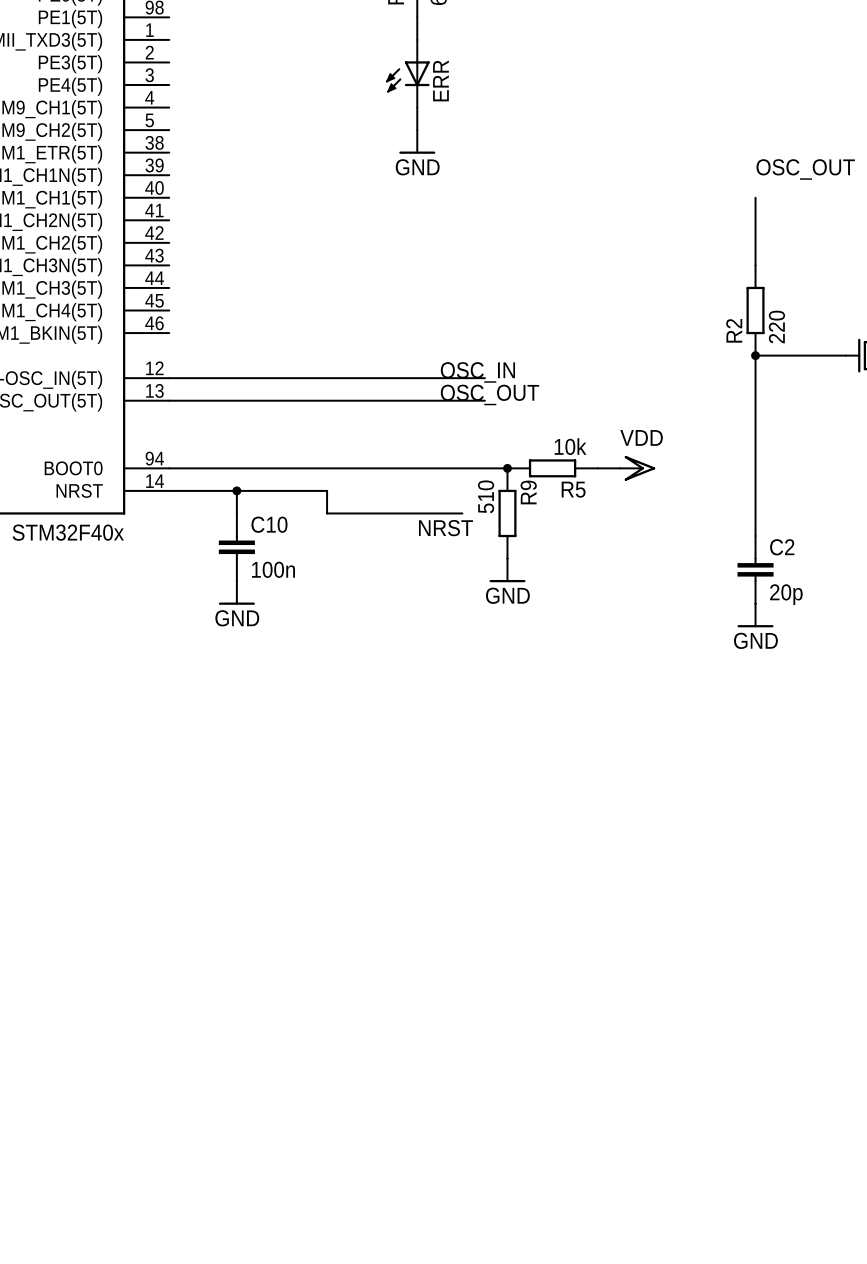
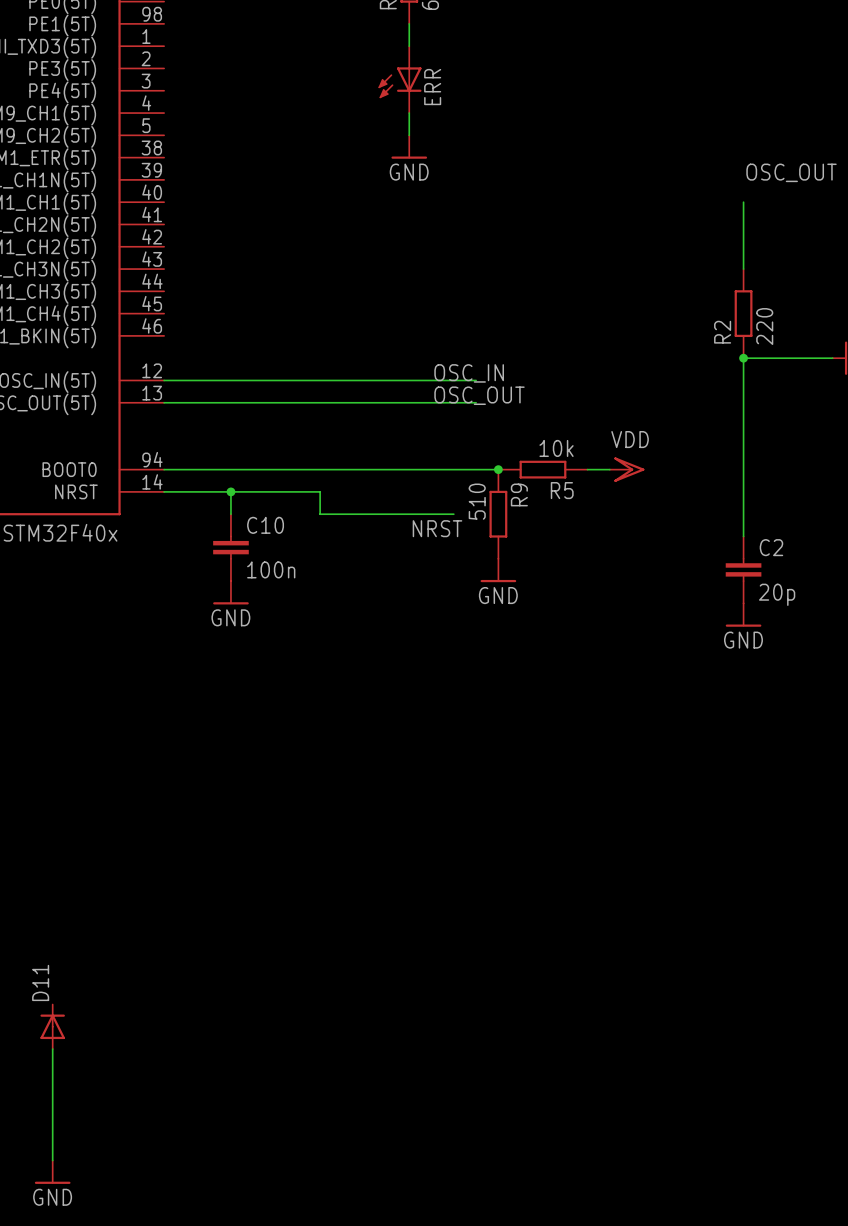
D11: none -> (52, 1026)
wire: none -> (52, 1049) (52, 1160)
power symbol: none -> GND (52, 1172)

